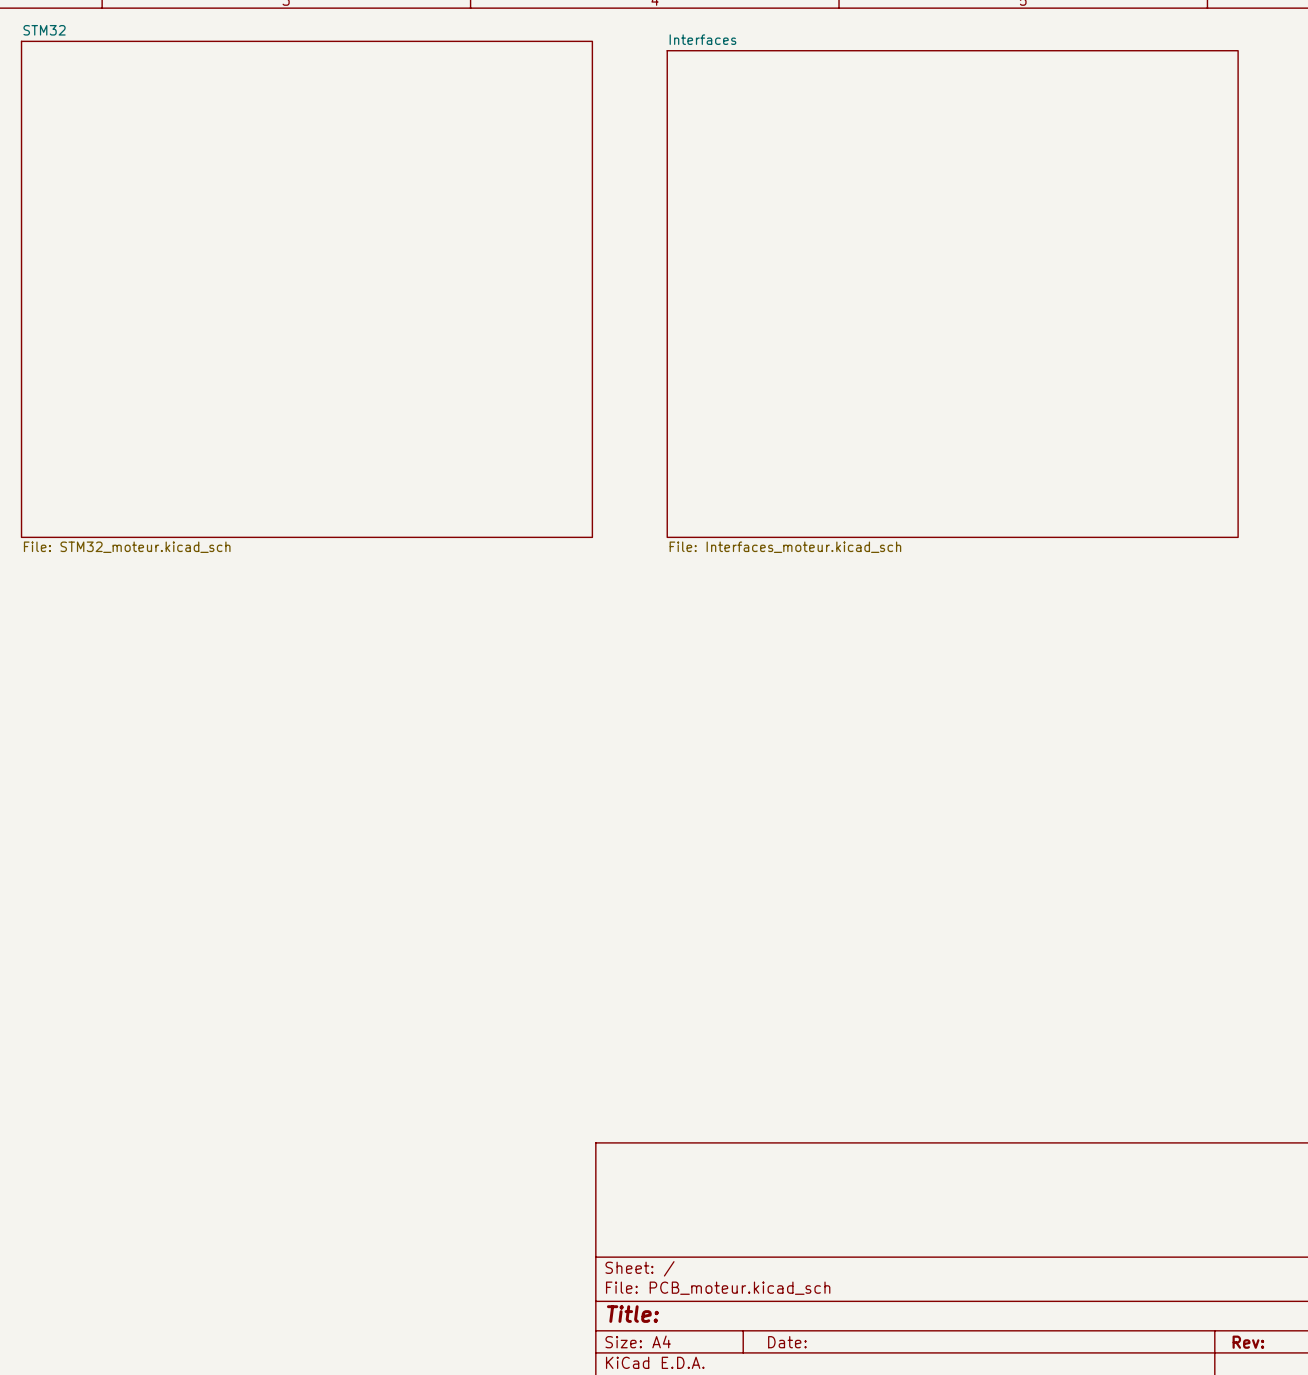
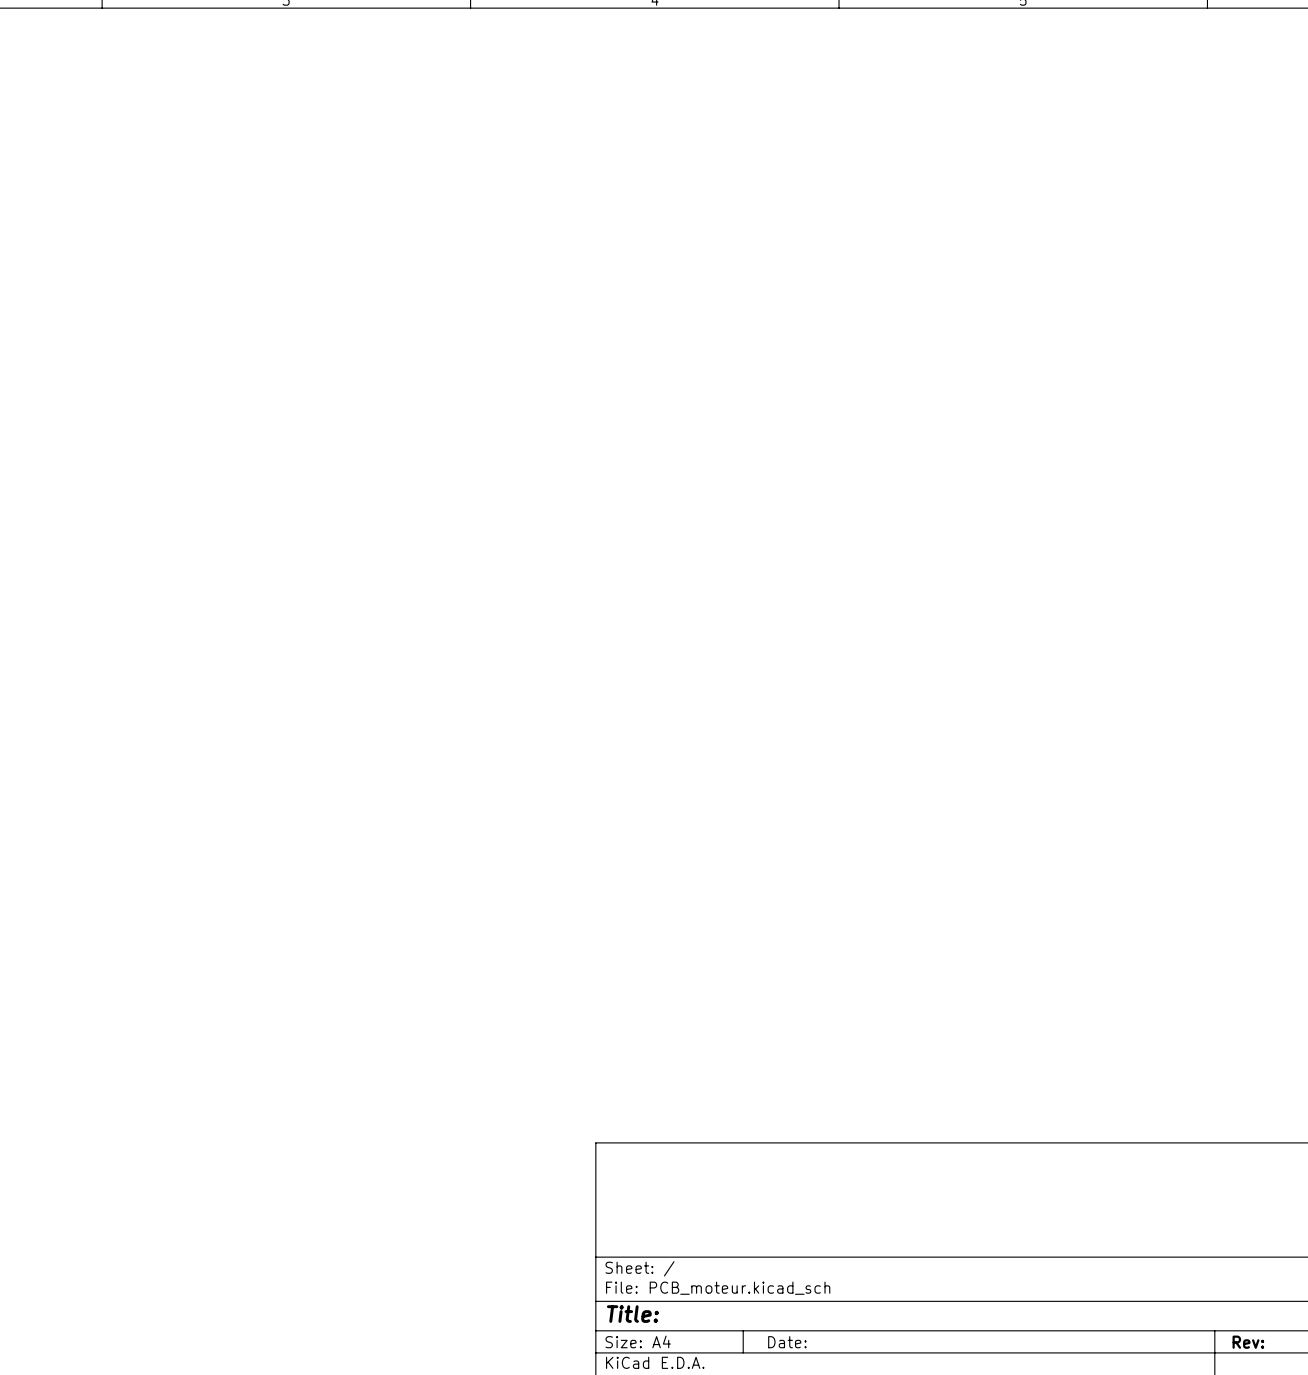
sheet STM32: File: STM32_moteur.kicad_sch (306, 289) -> none
sheet Interfaces: File: Interfaces_moteur.kicad_sch (952, 294) -> none

